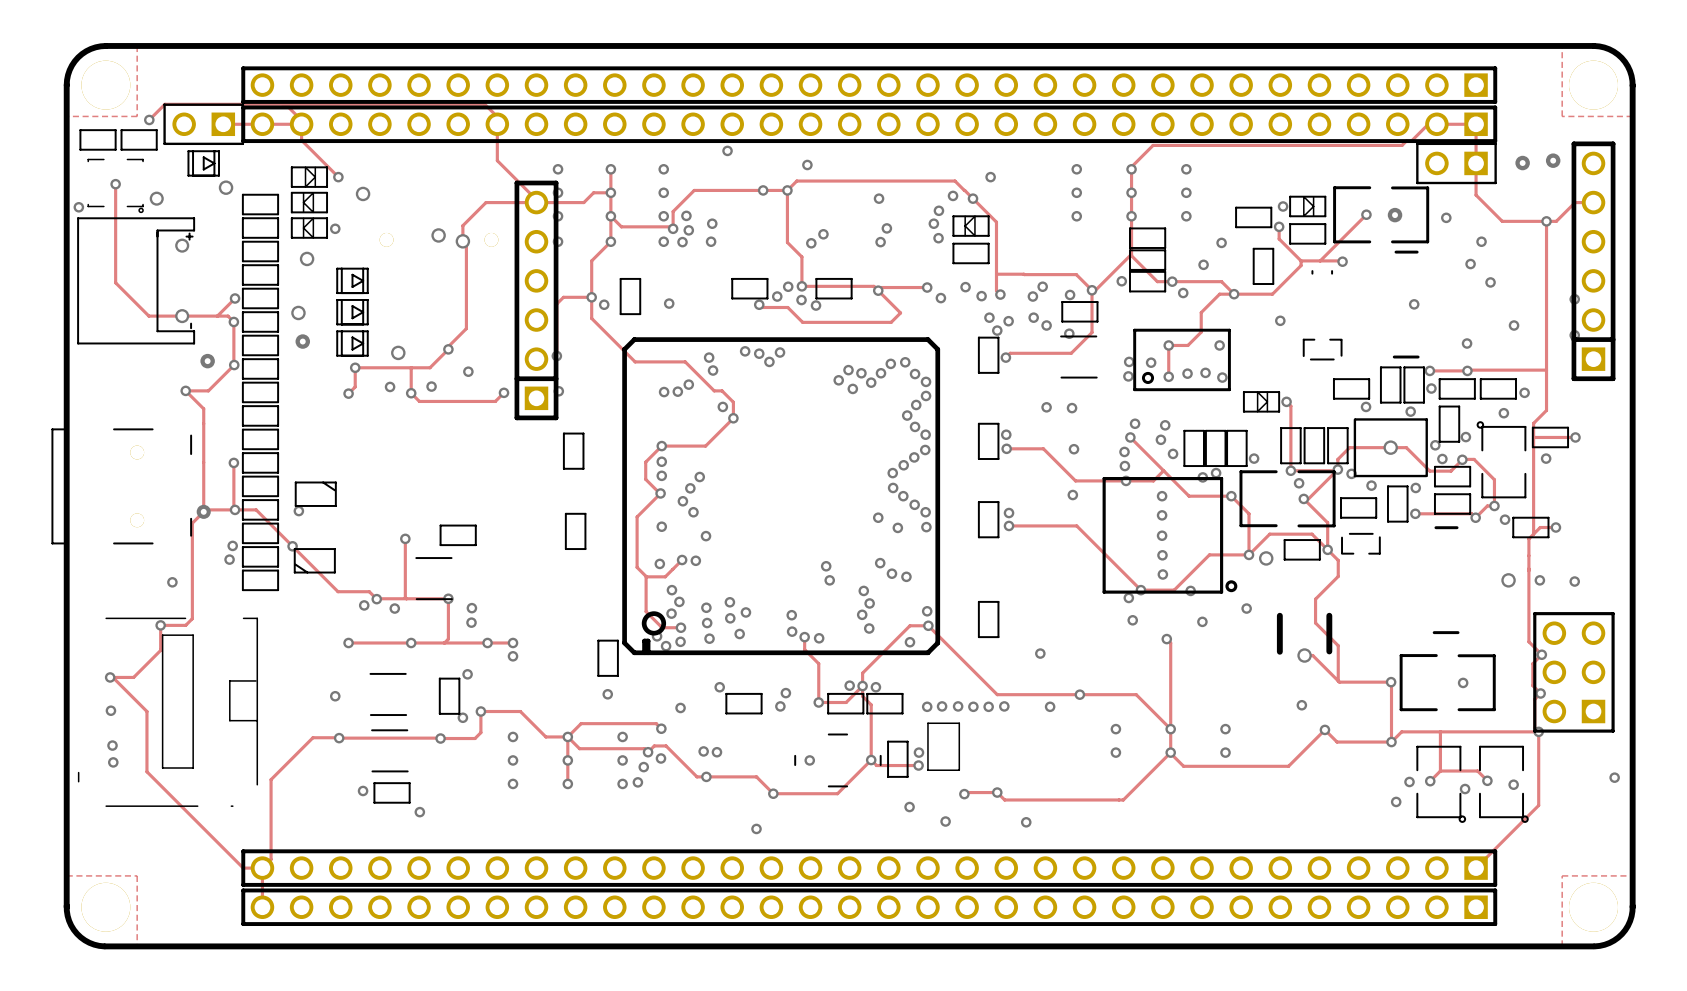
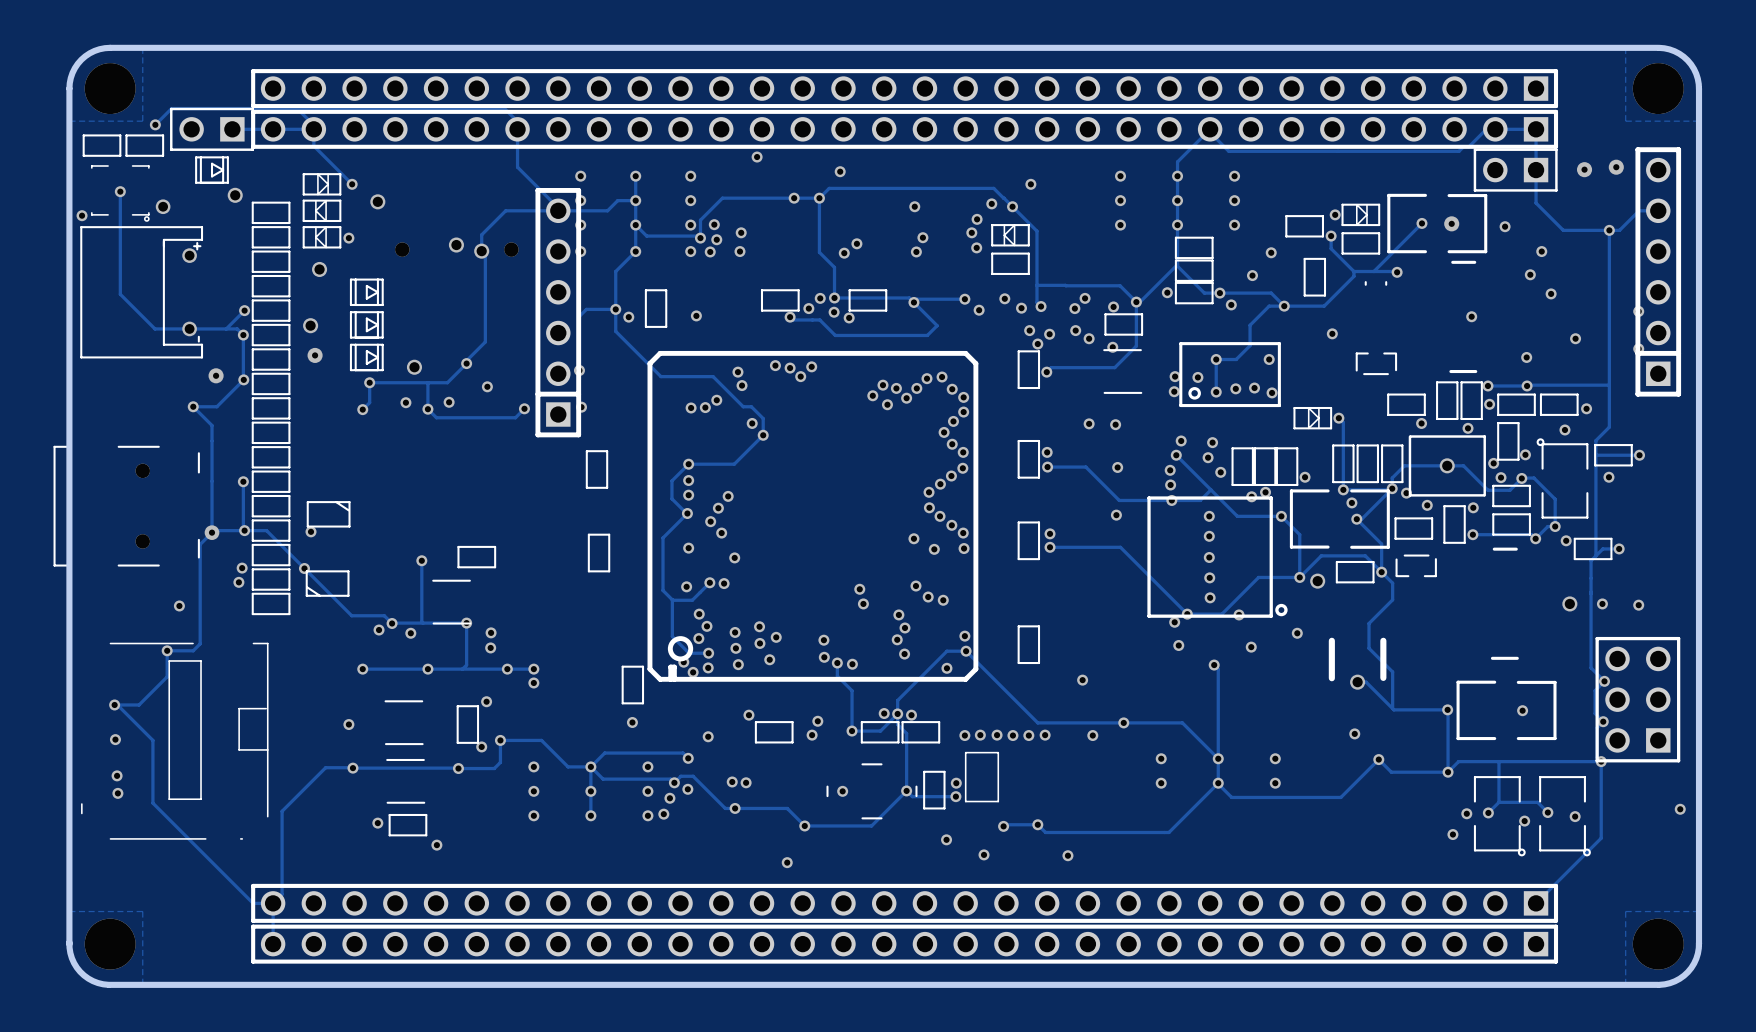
track: (1180, 145) (1153, 145) (1131, 166) -> (1228, 151) (1210, 132) (1210, 129) (1177, 161) (1177, 173)

